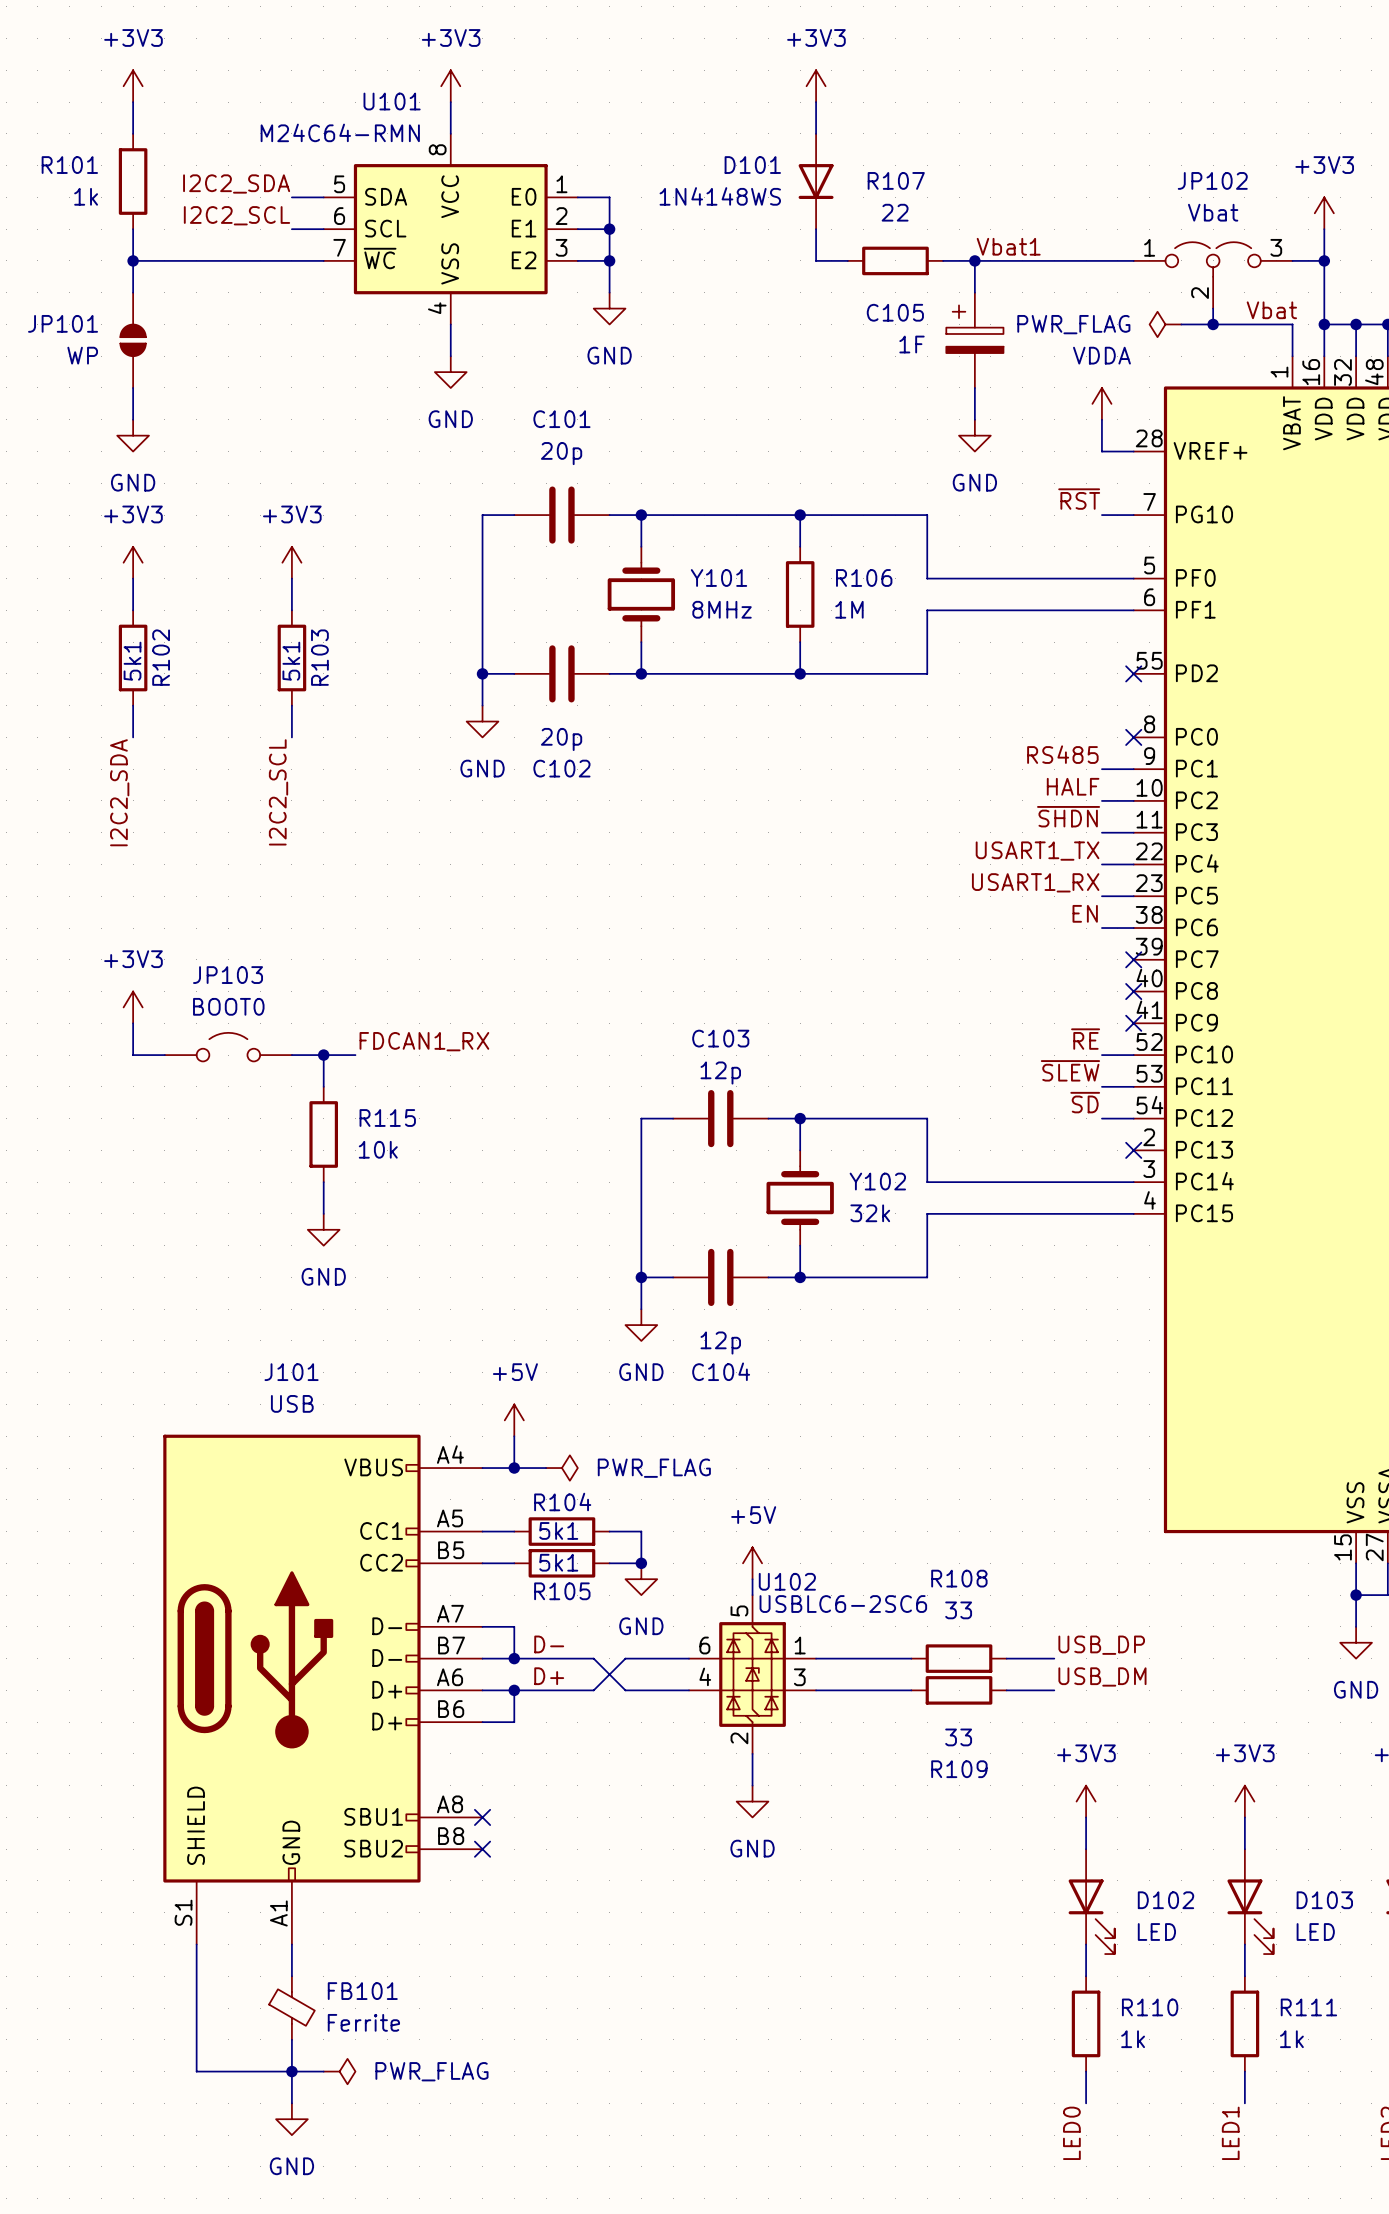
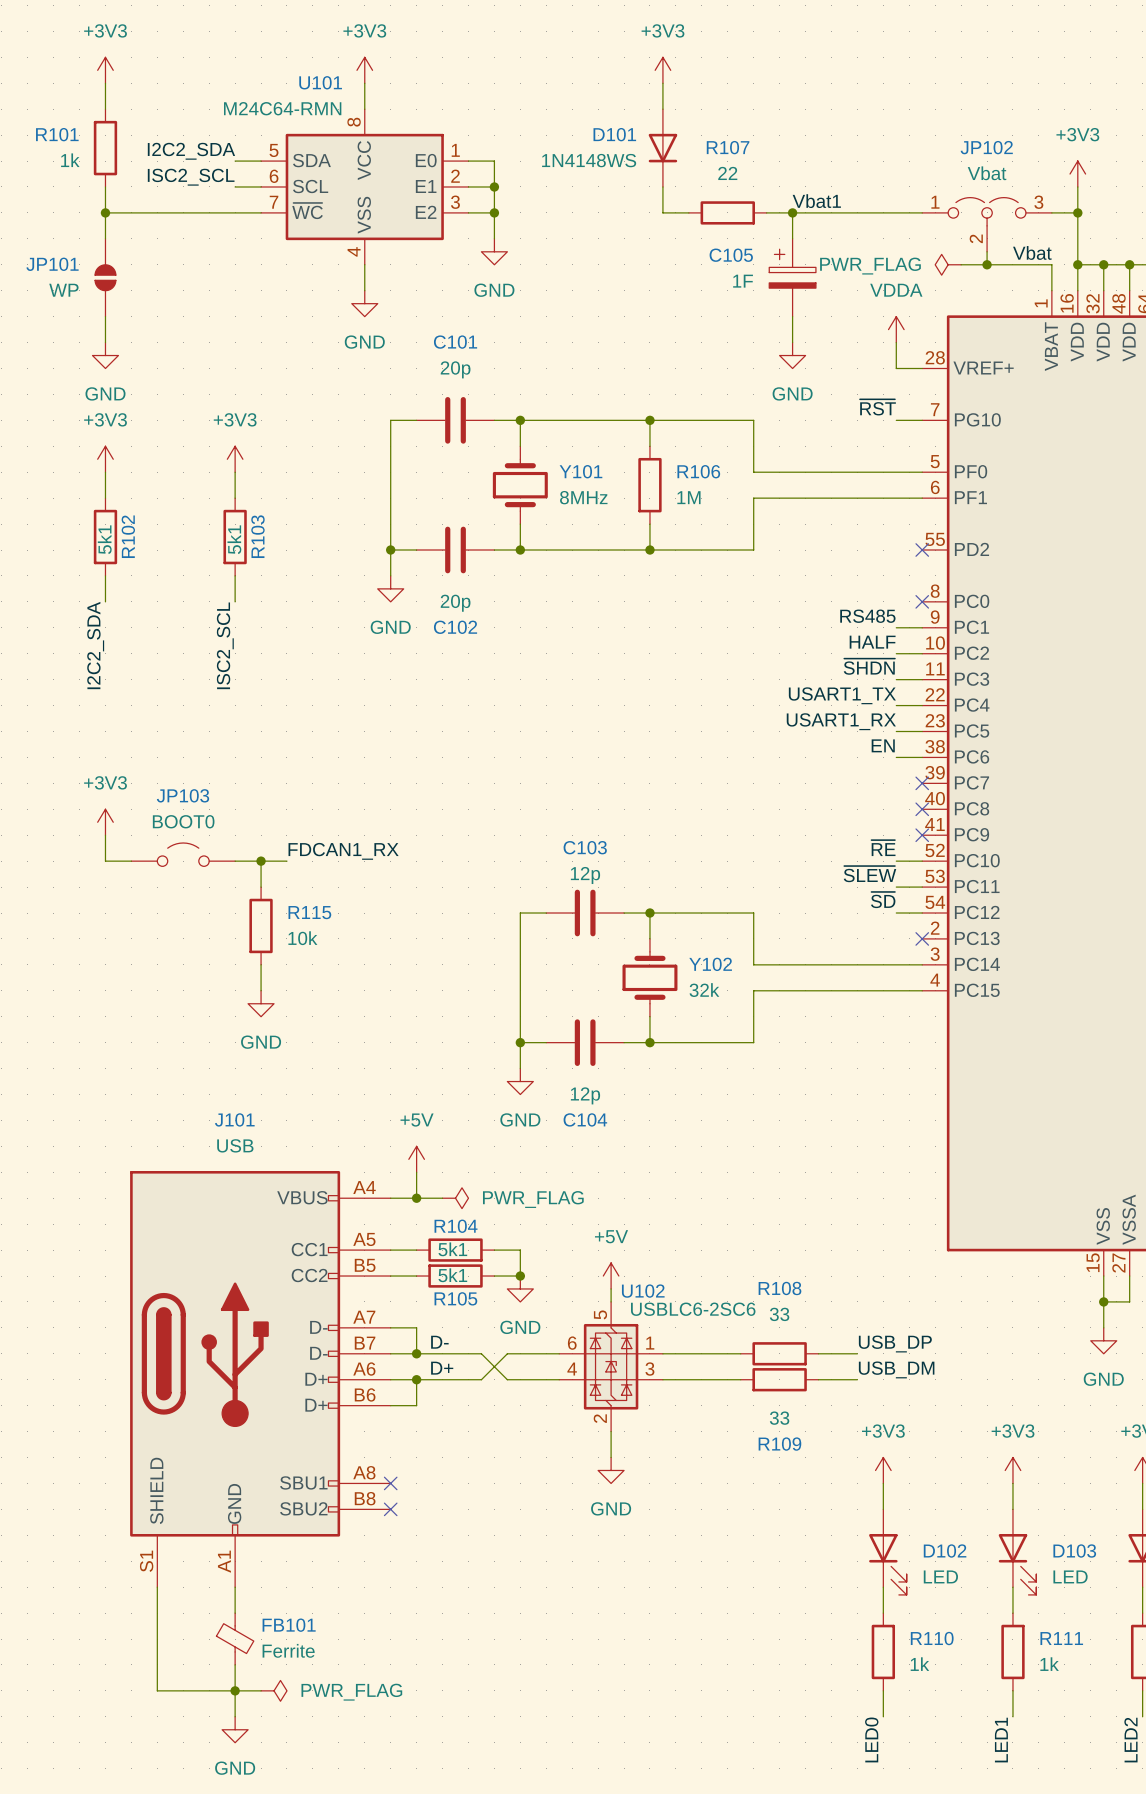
label: I2C2_SCL (236, 215) -> ISC2_SCL (191, 177)
label: I2C2_SCL (278, 792) -> ISC2_SCL (225, 645)

